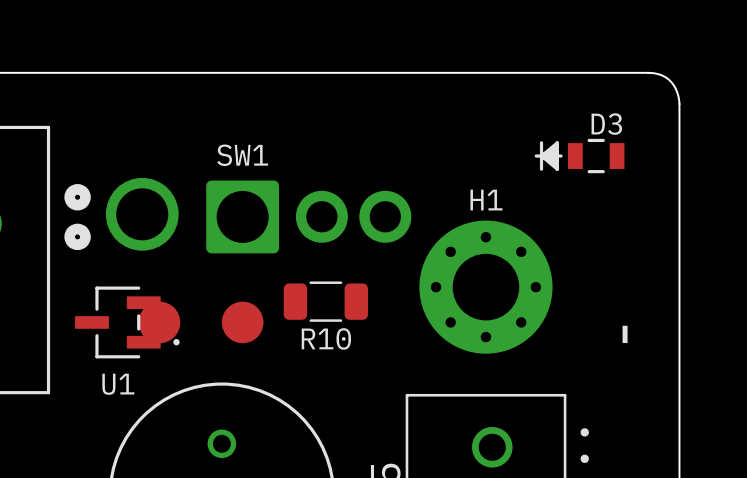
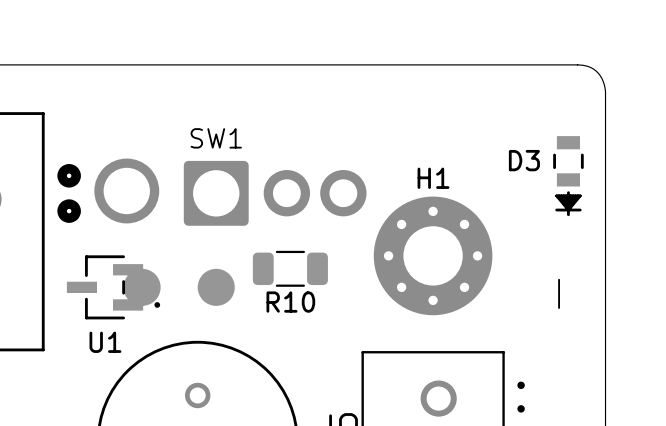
D3 rotation: 0° (579, 156) -> 90° counterclockwise (568, 176)
D3 position: (579, 156) -> (568, 176)

